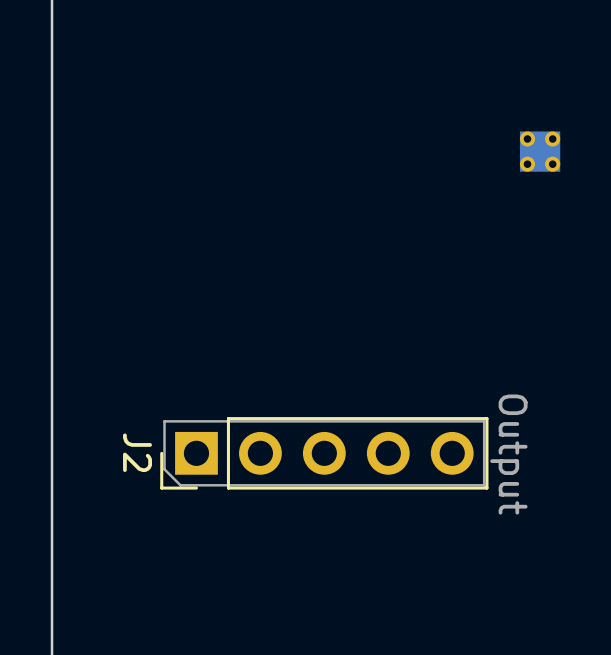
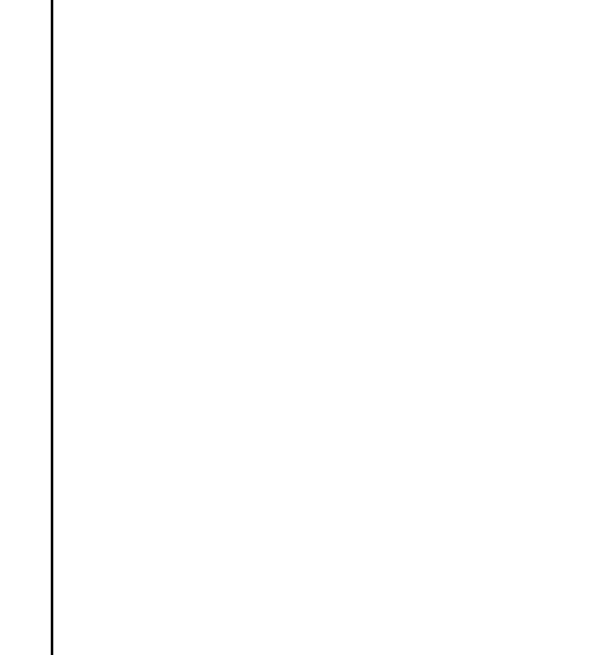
part: (540, 151) -> none
J2: Output (324, 453) -> none

